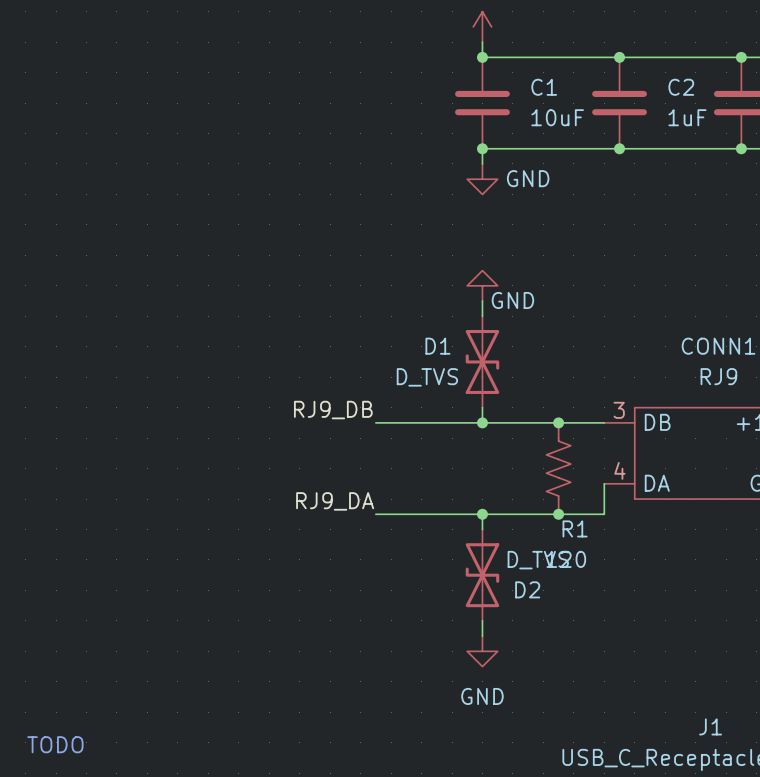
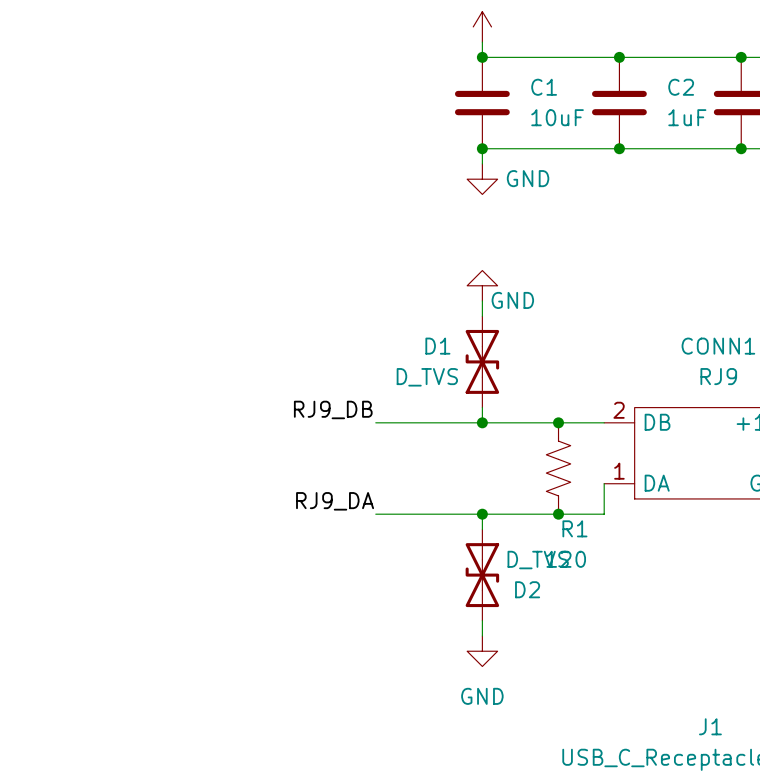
CONN1 pin number: 3 (619, 410) -> 2 (619, 410)
CONN1 pin number: 4 (619, 470) -> 1 (619, 471)
text: TODO (55, 744) -> none

